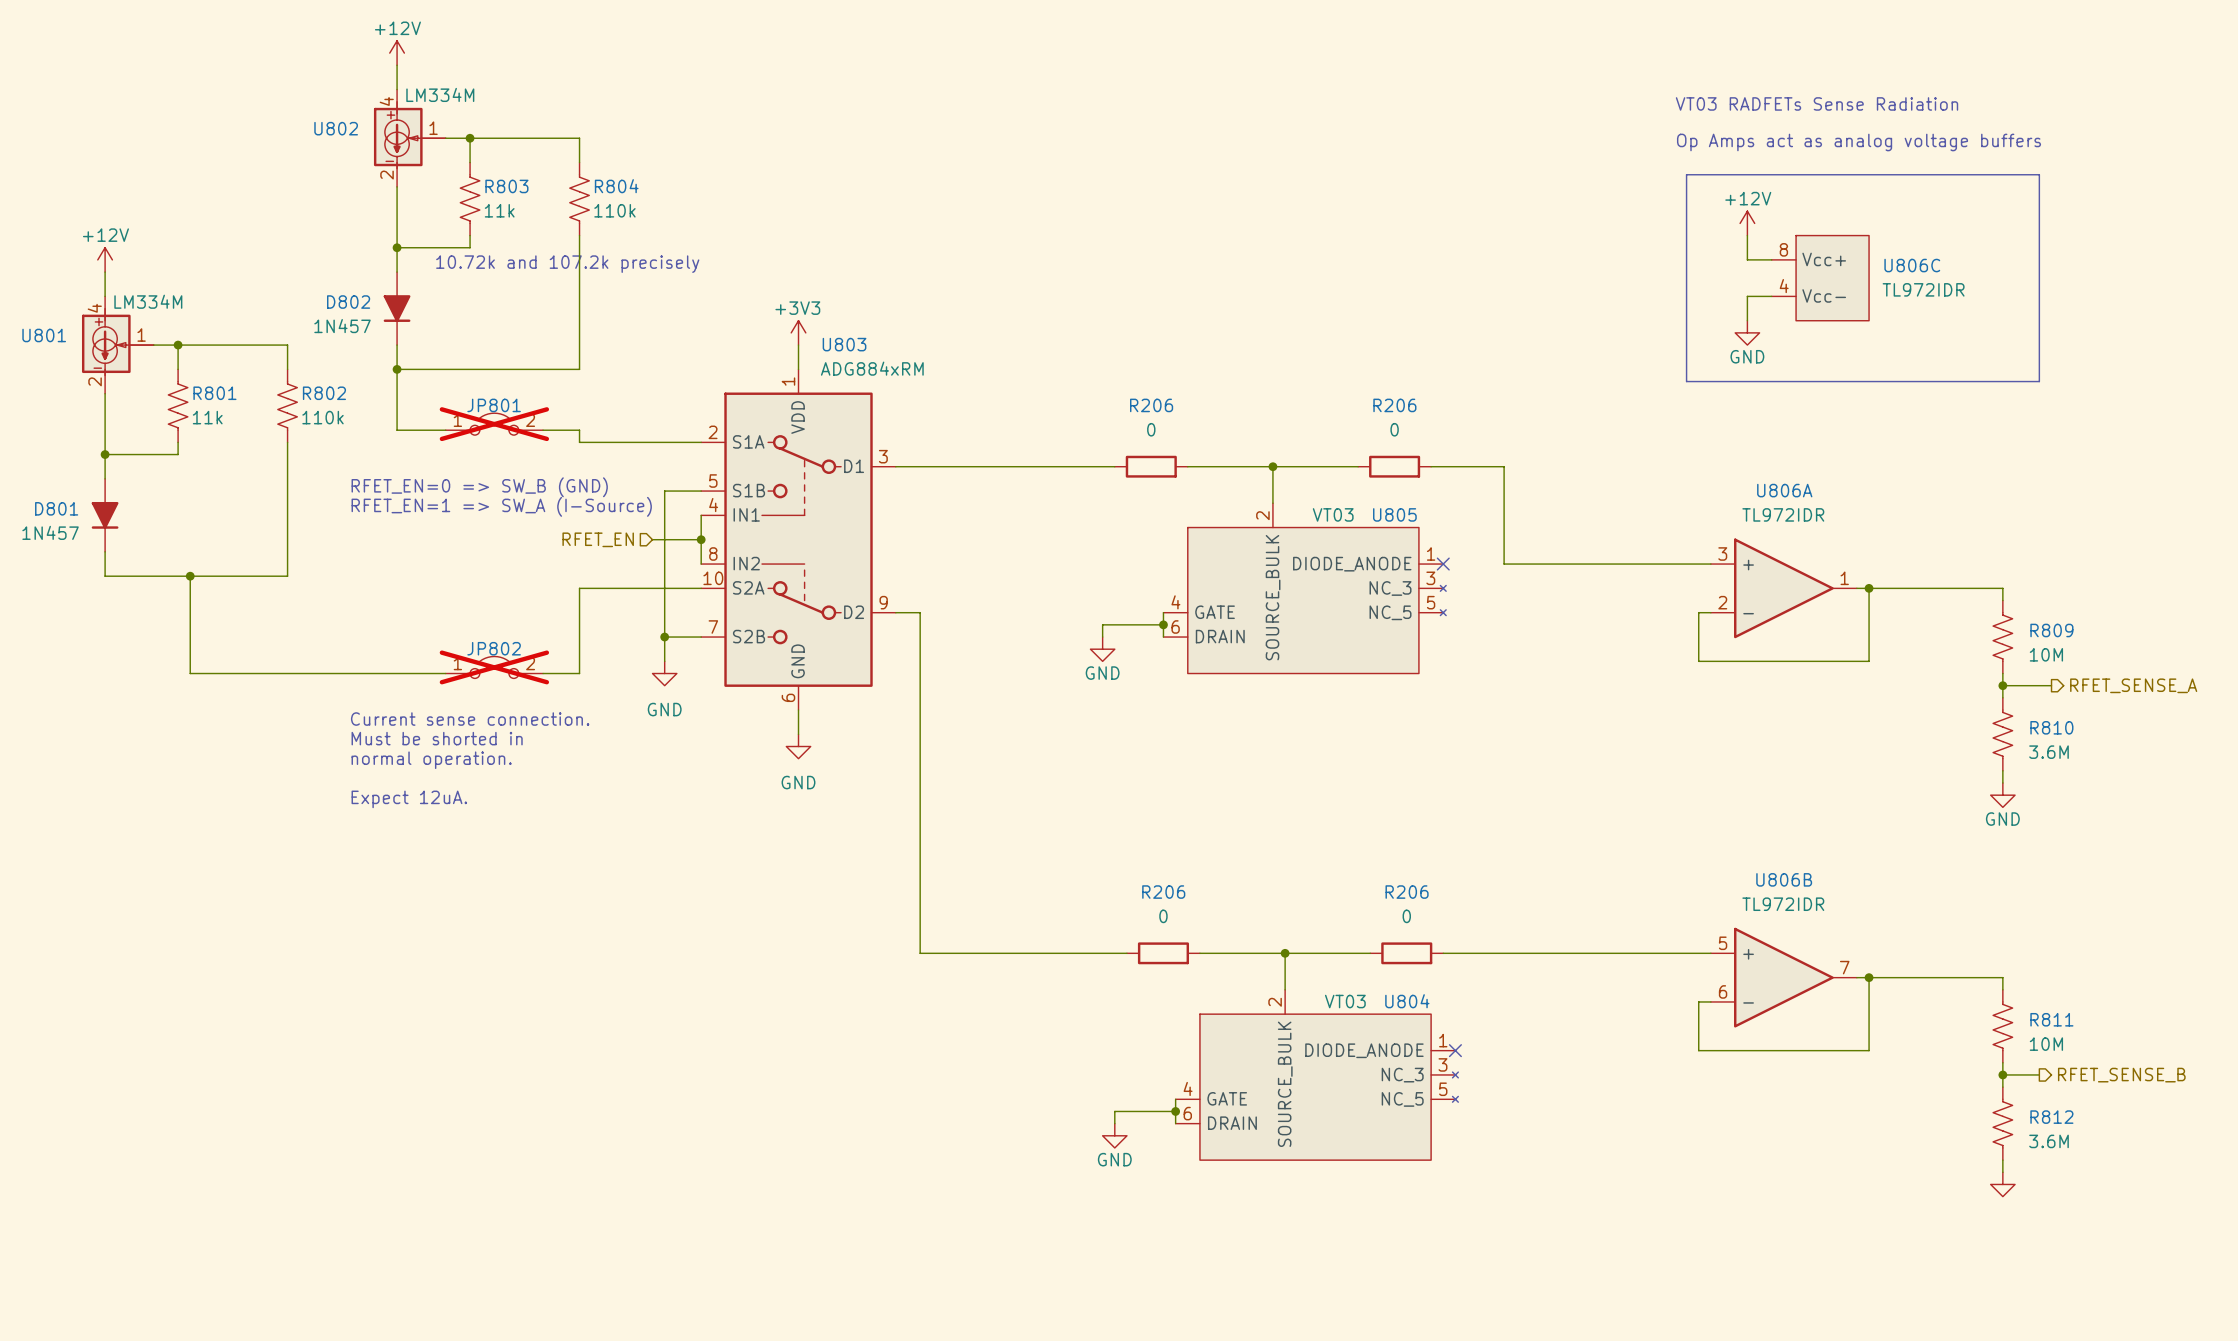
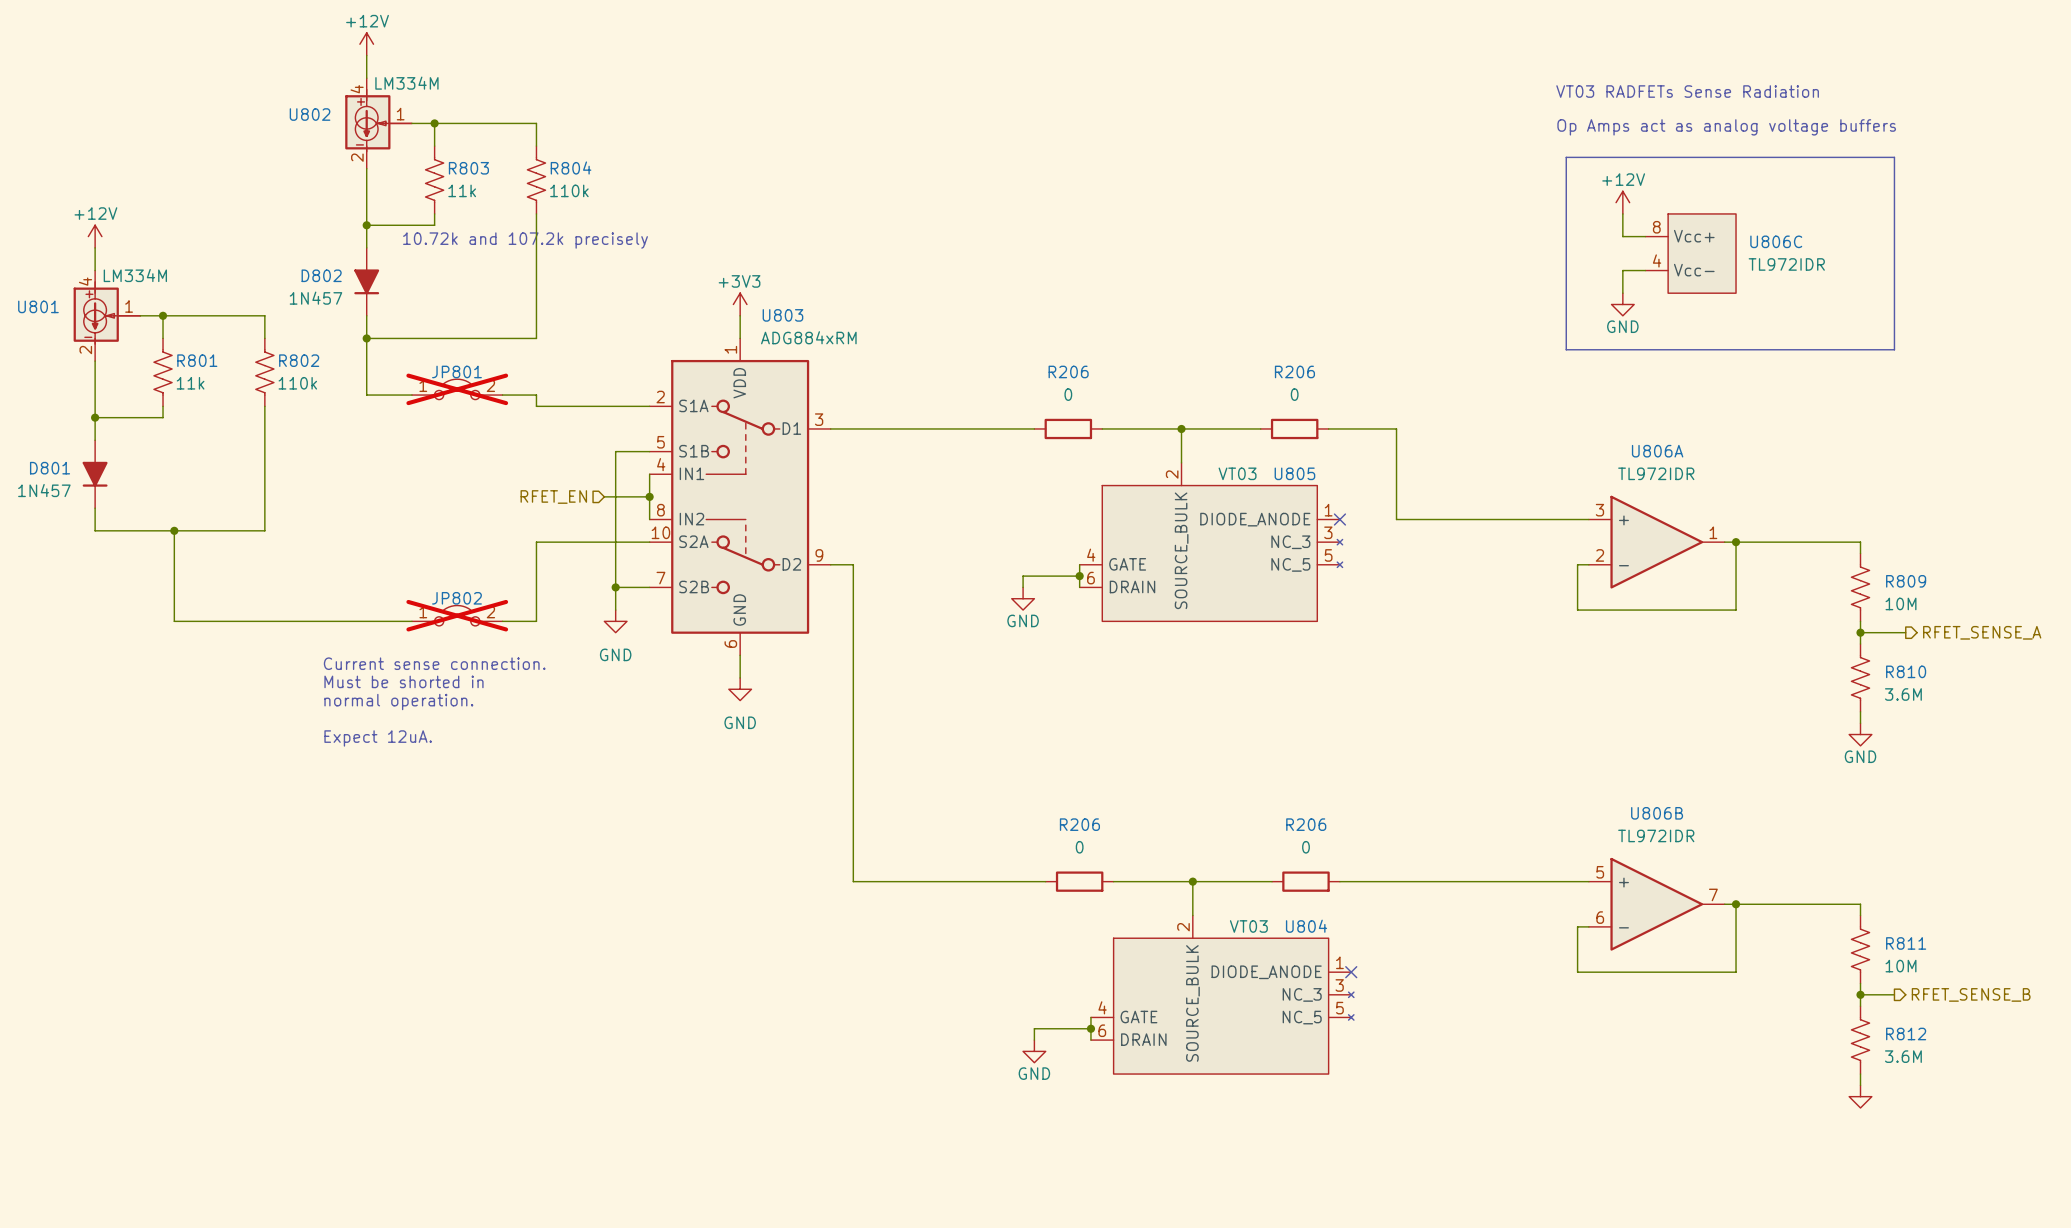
text: RFET_EN=0 => SW_B (GND) (479, 487) -> none
text: RFET_EN=1 => SW_A (I-Source) (501, 506) -> none

